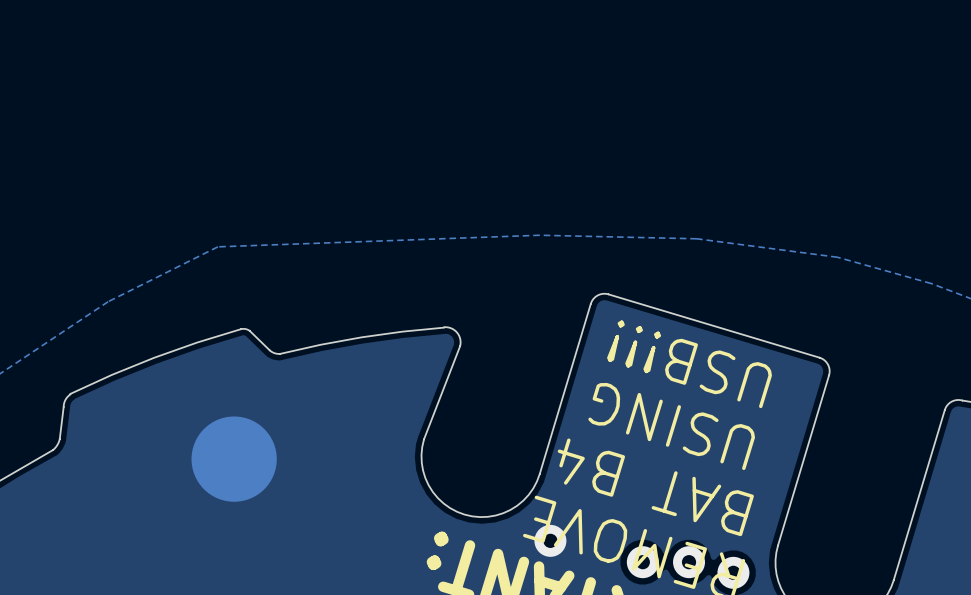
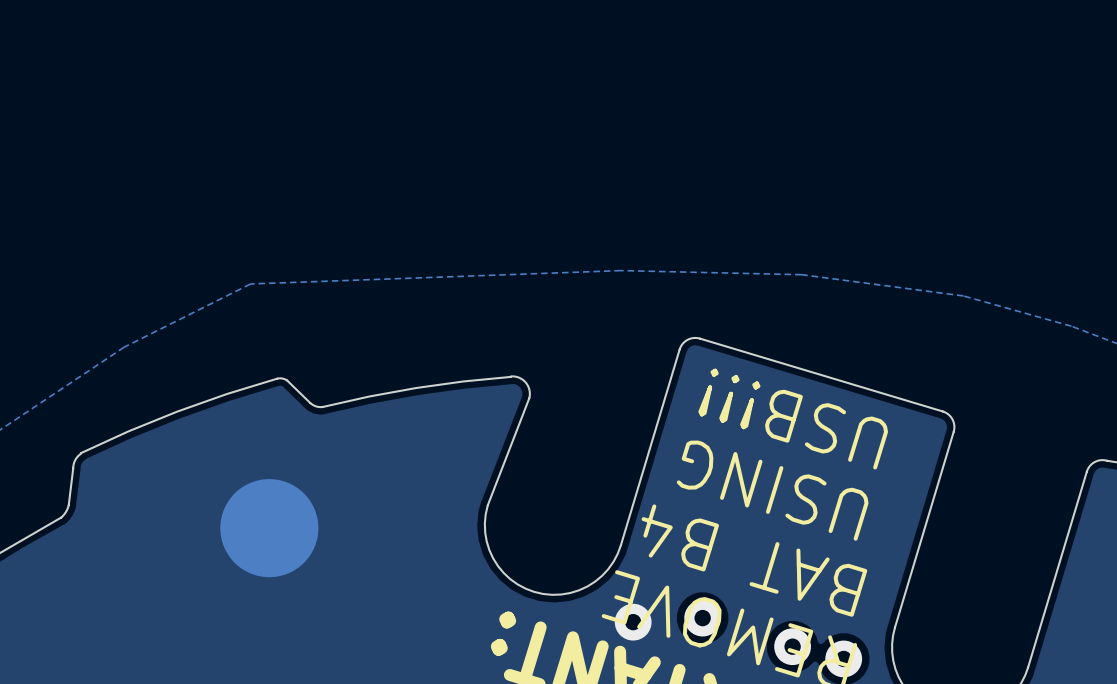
via position: (642, 562) -> (702, 618)

